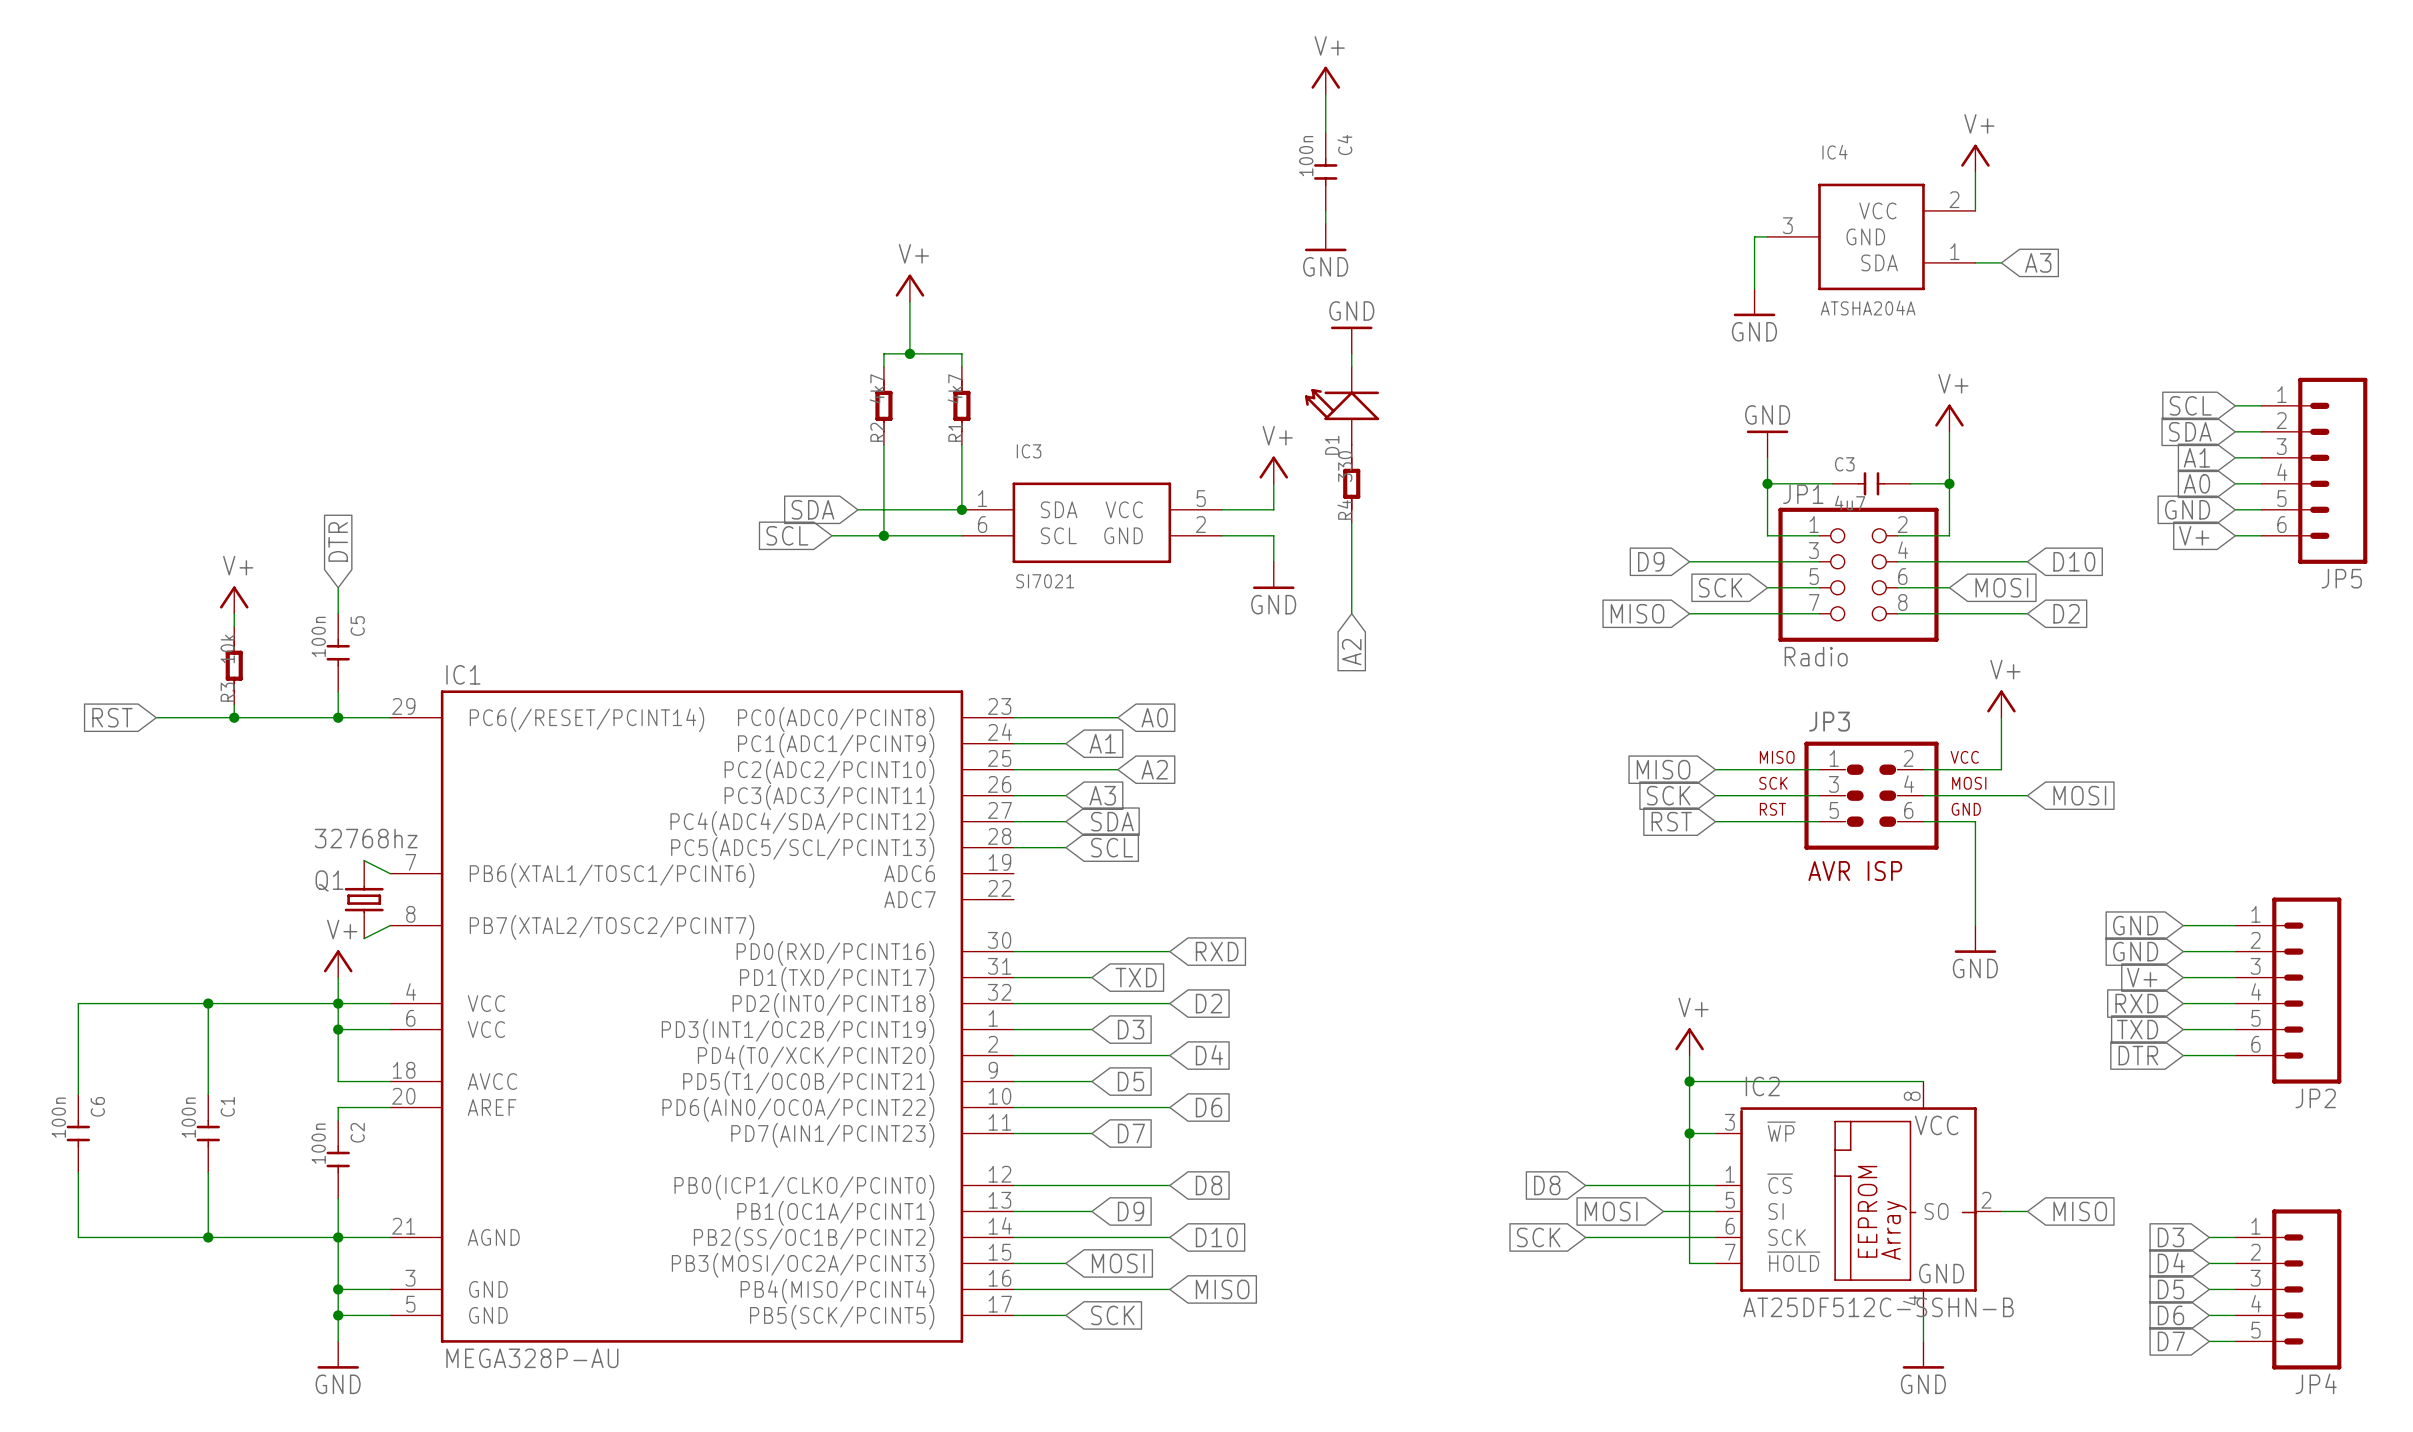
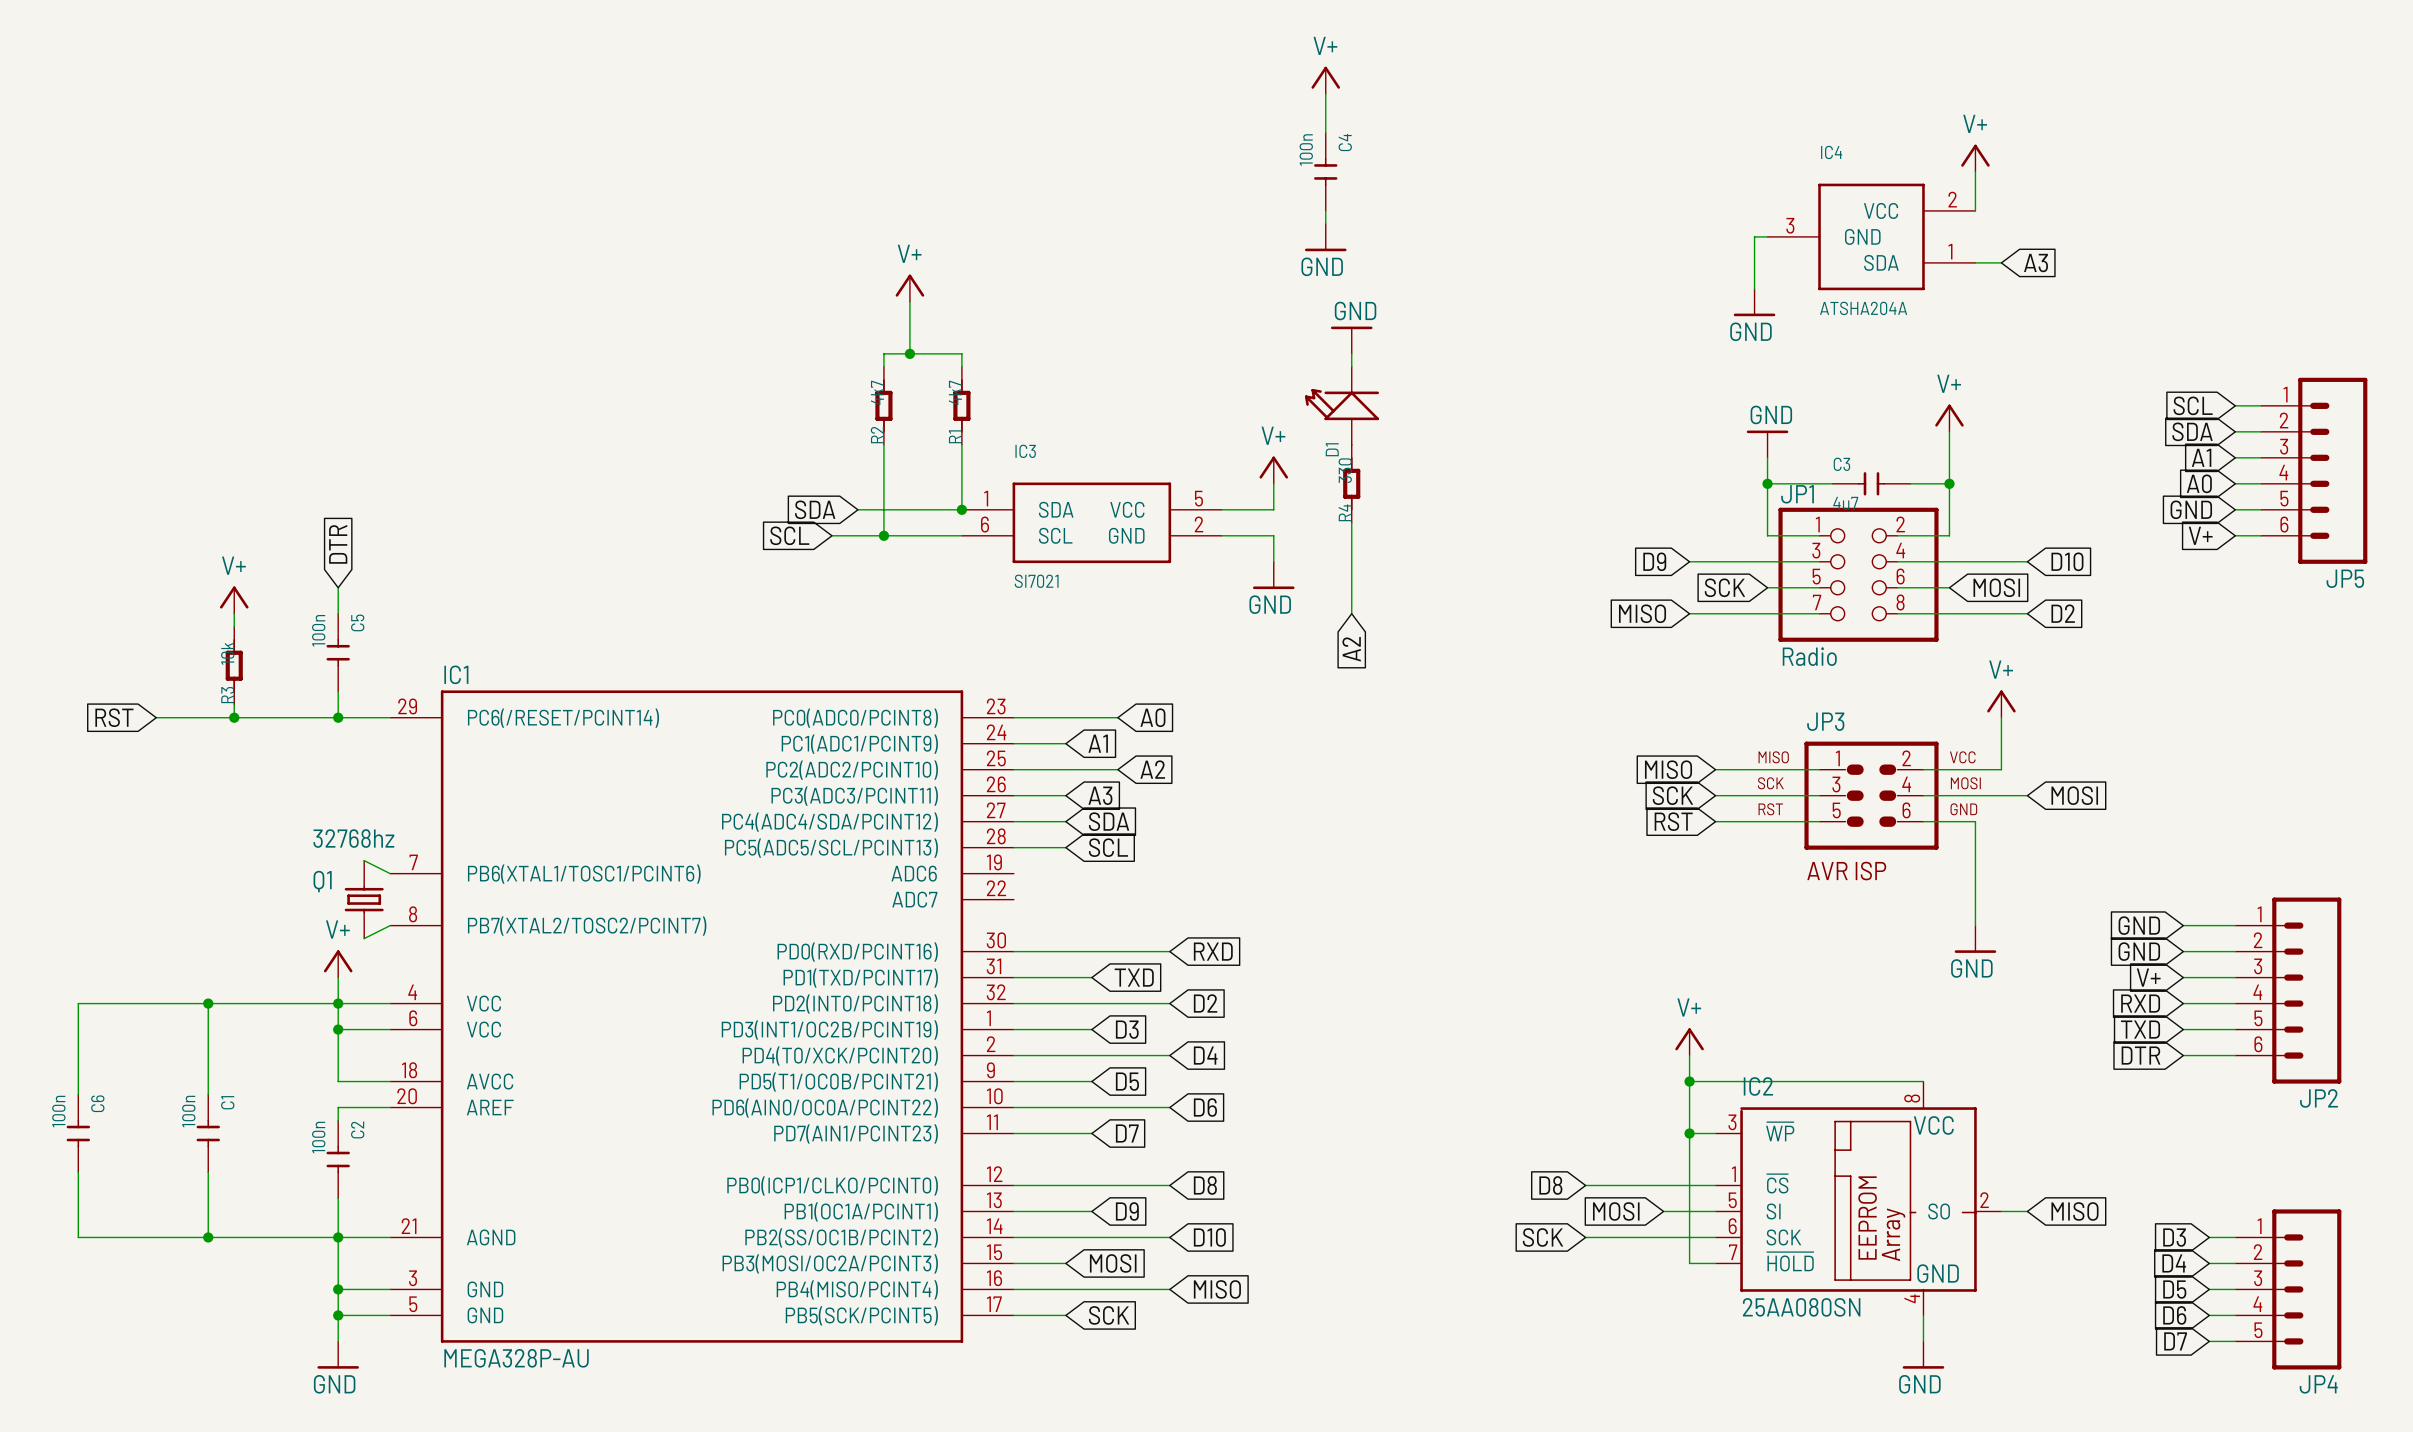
IC2 value: AT25DF512C-SSHN-B (1878, 1307) -> 25AA080SN (1801, 1307)

